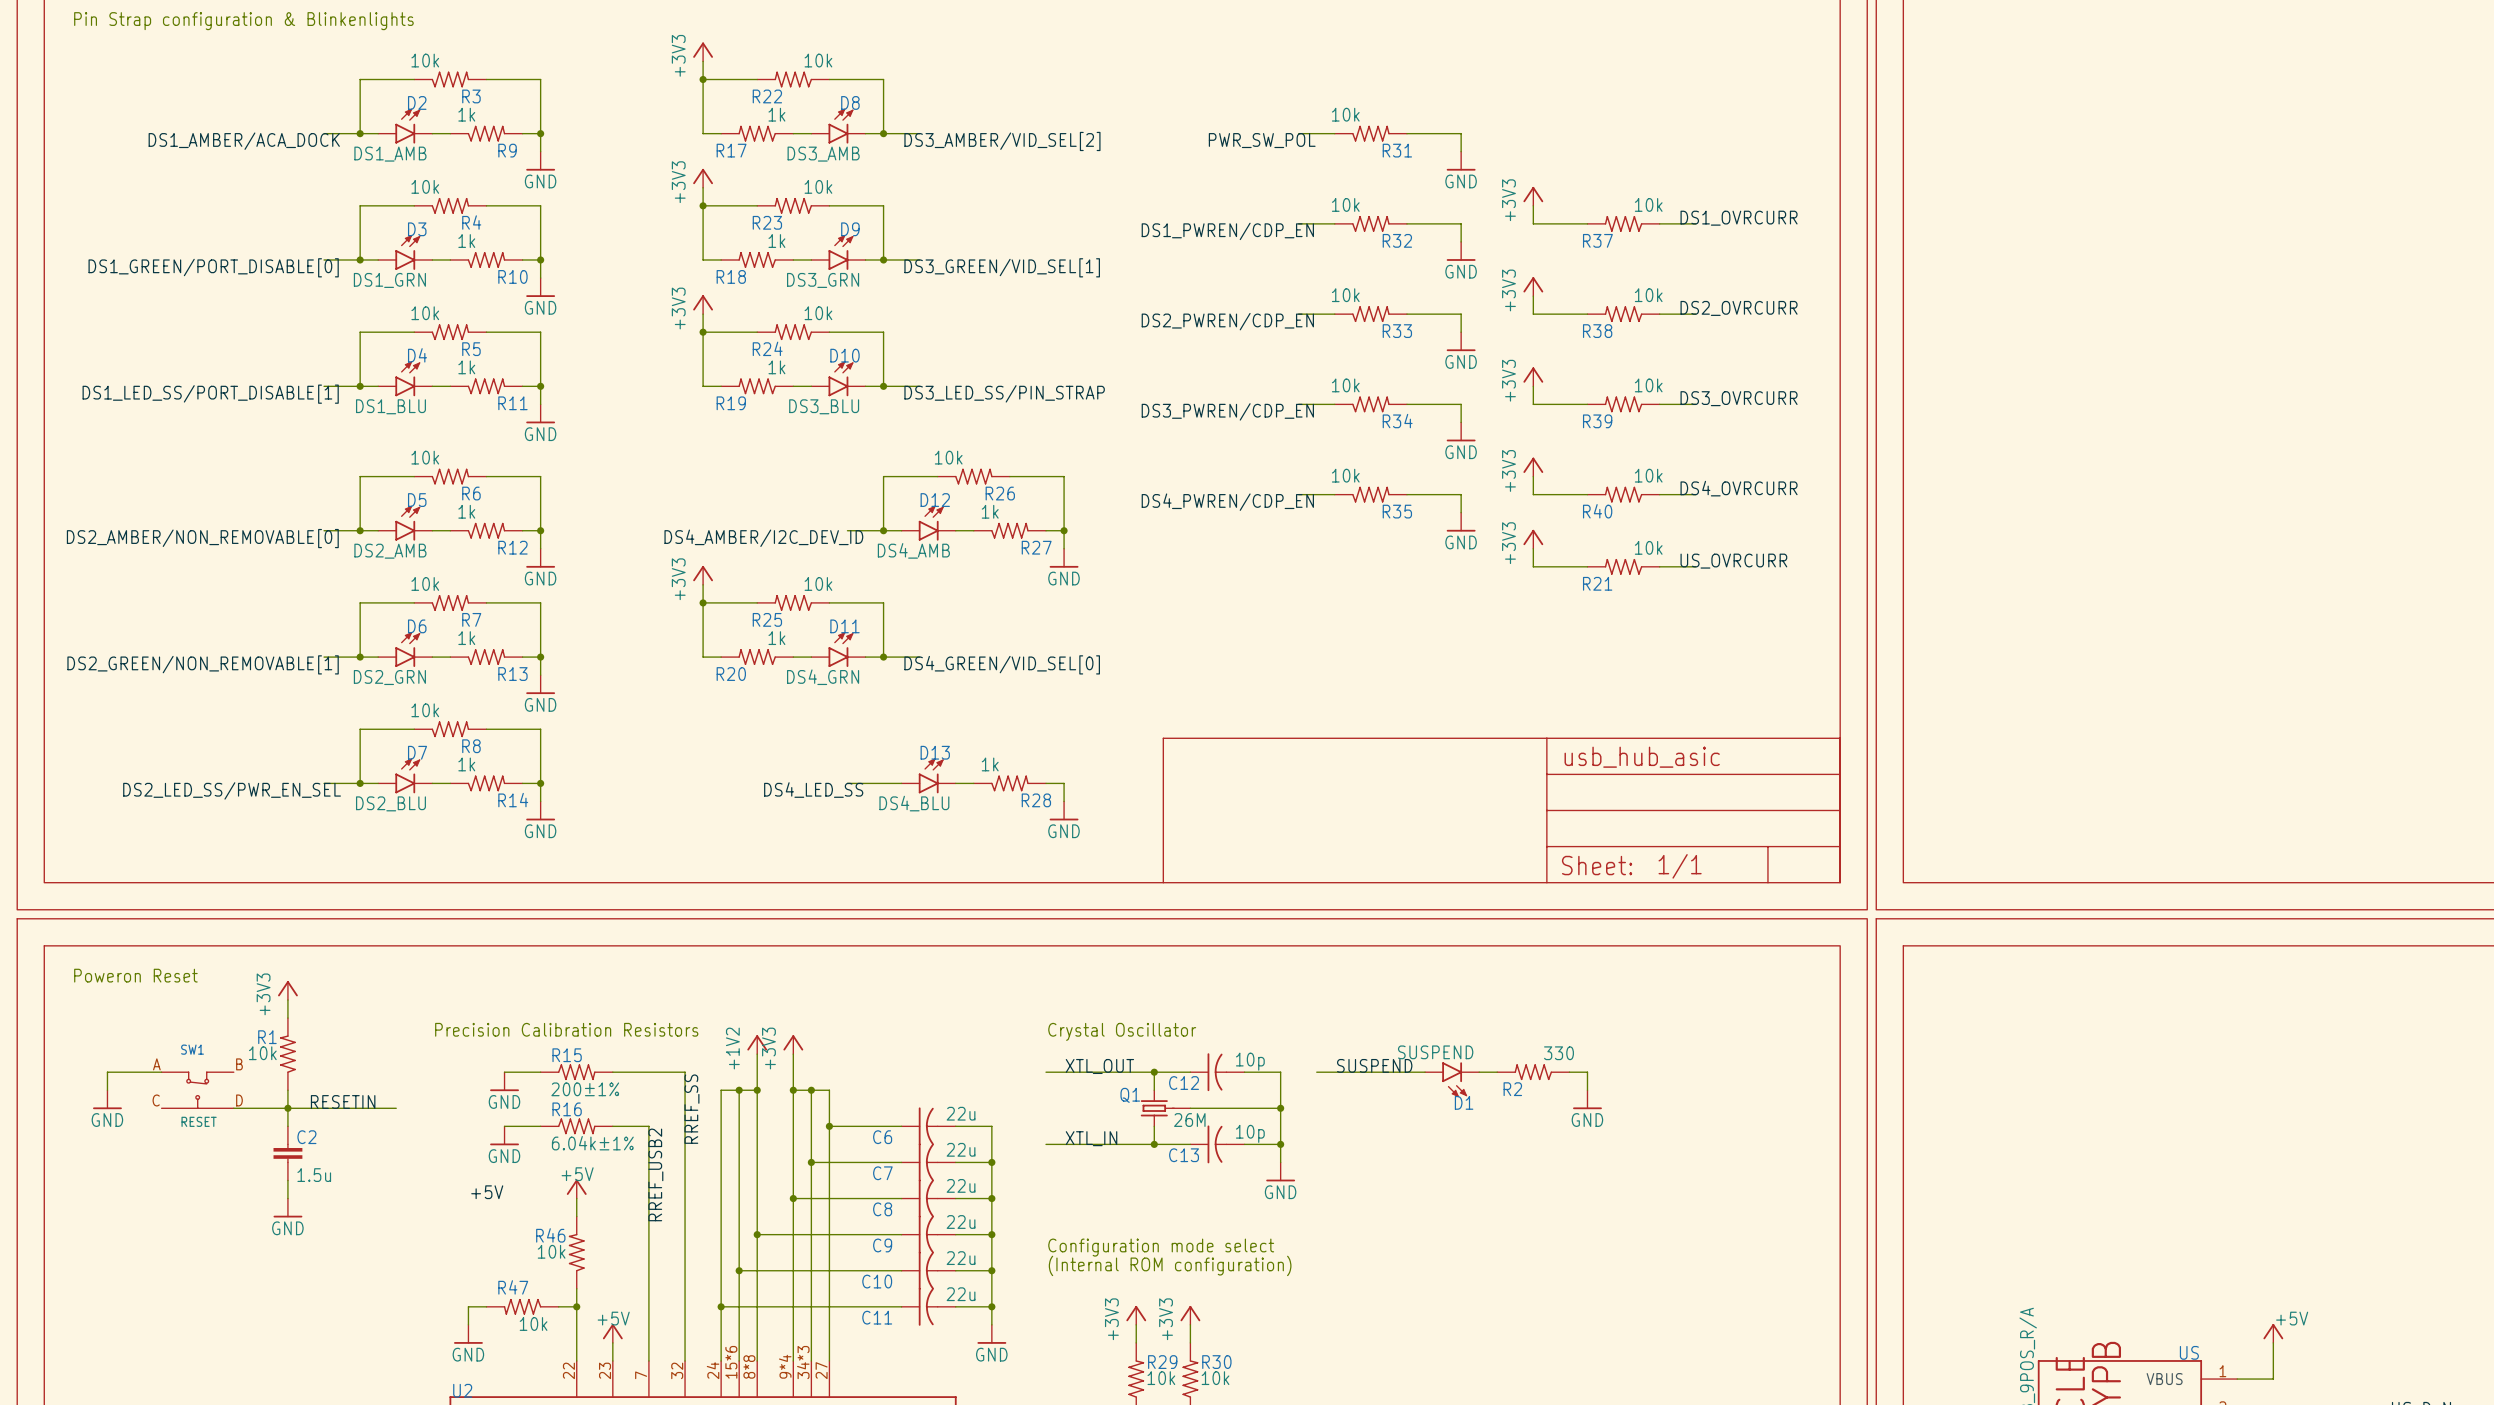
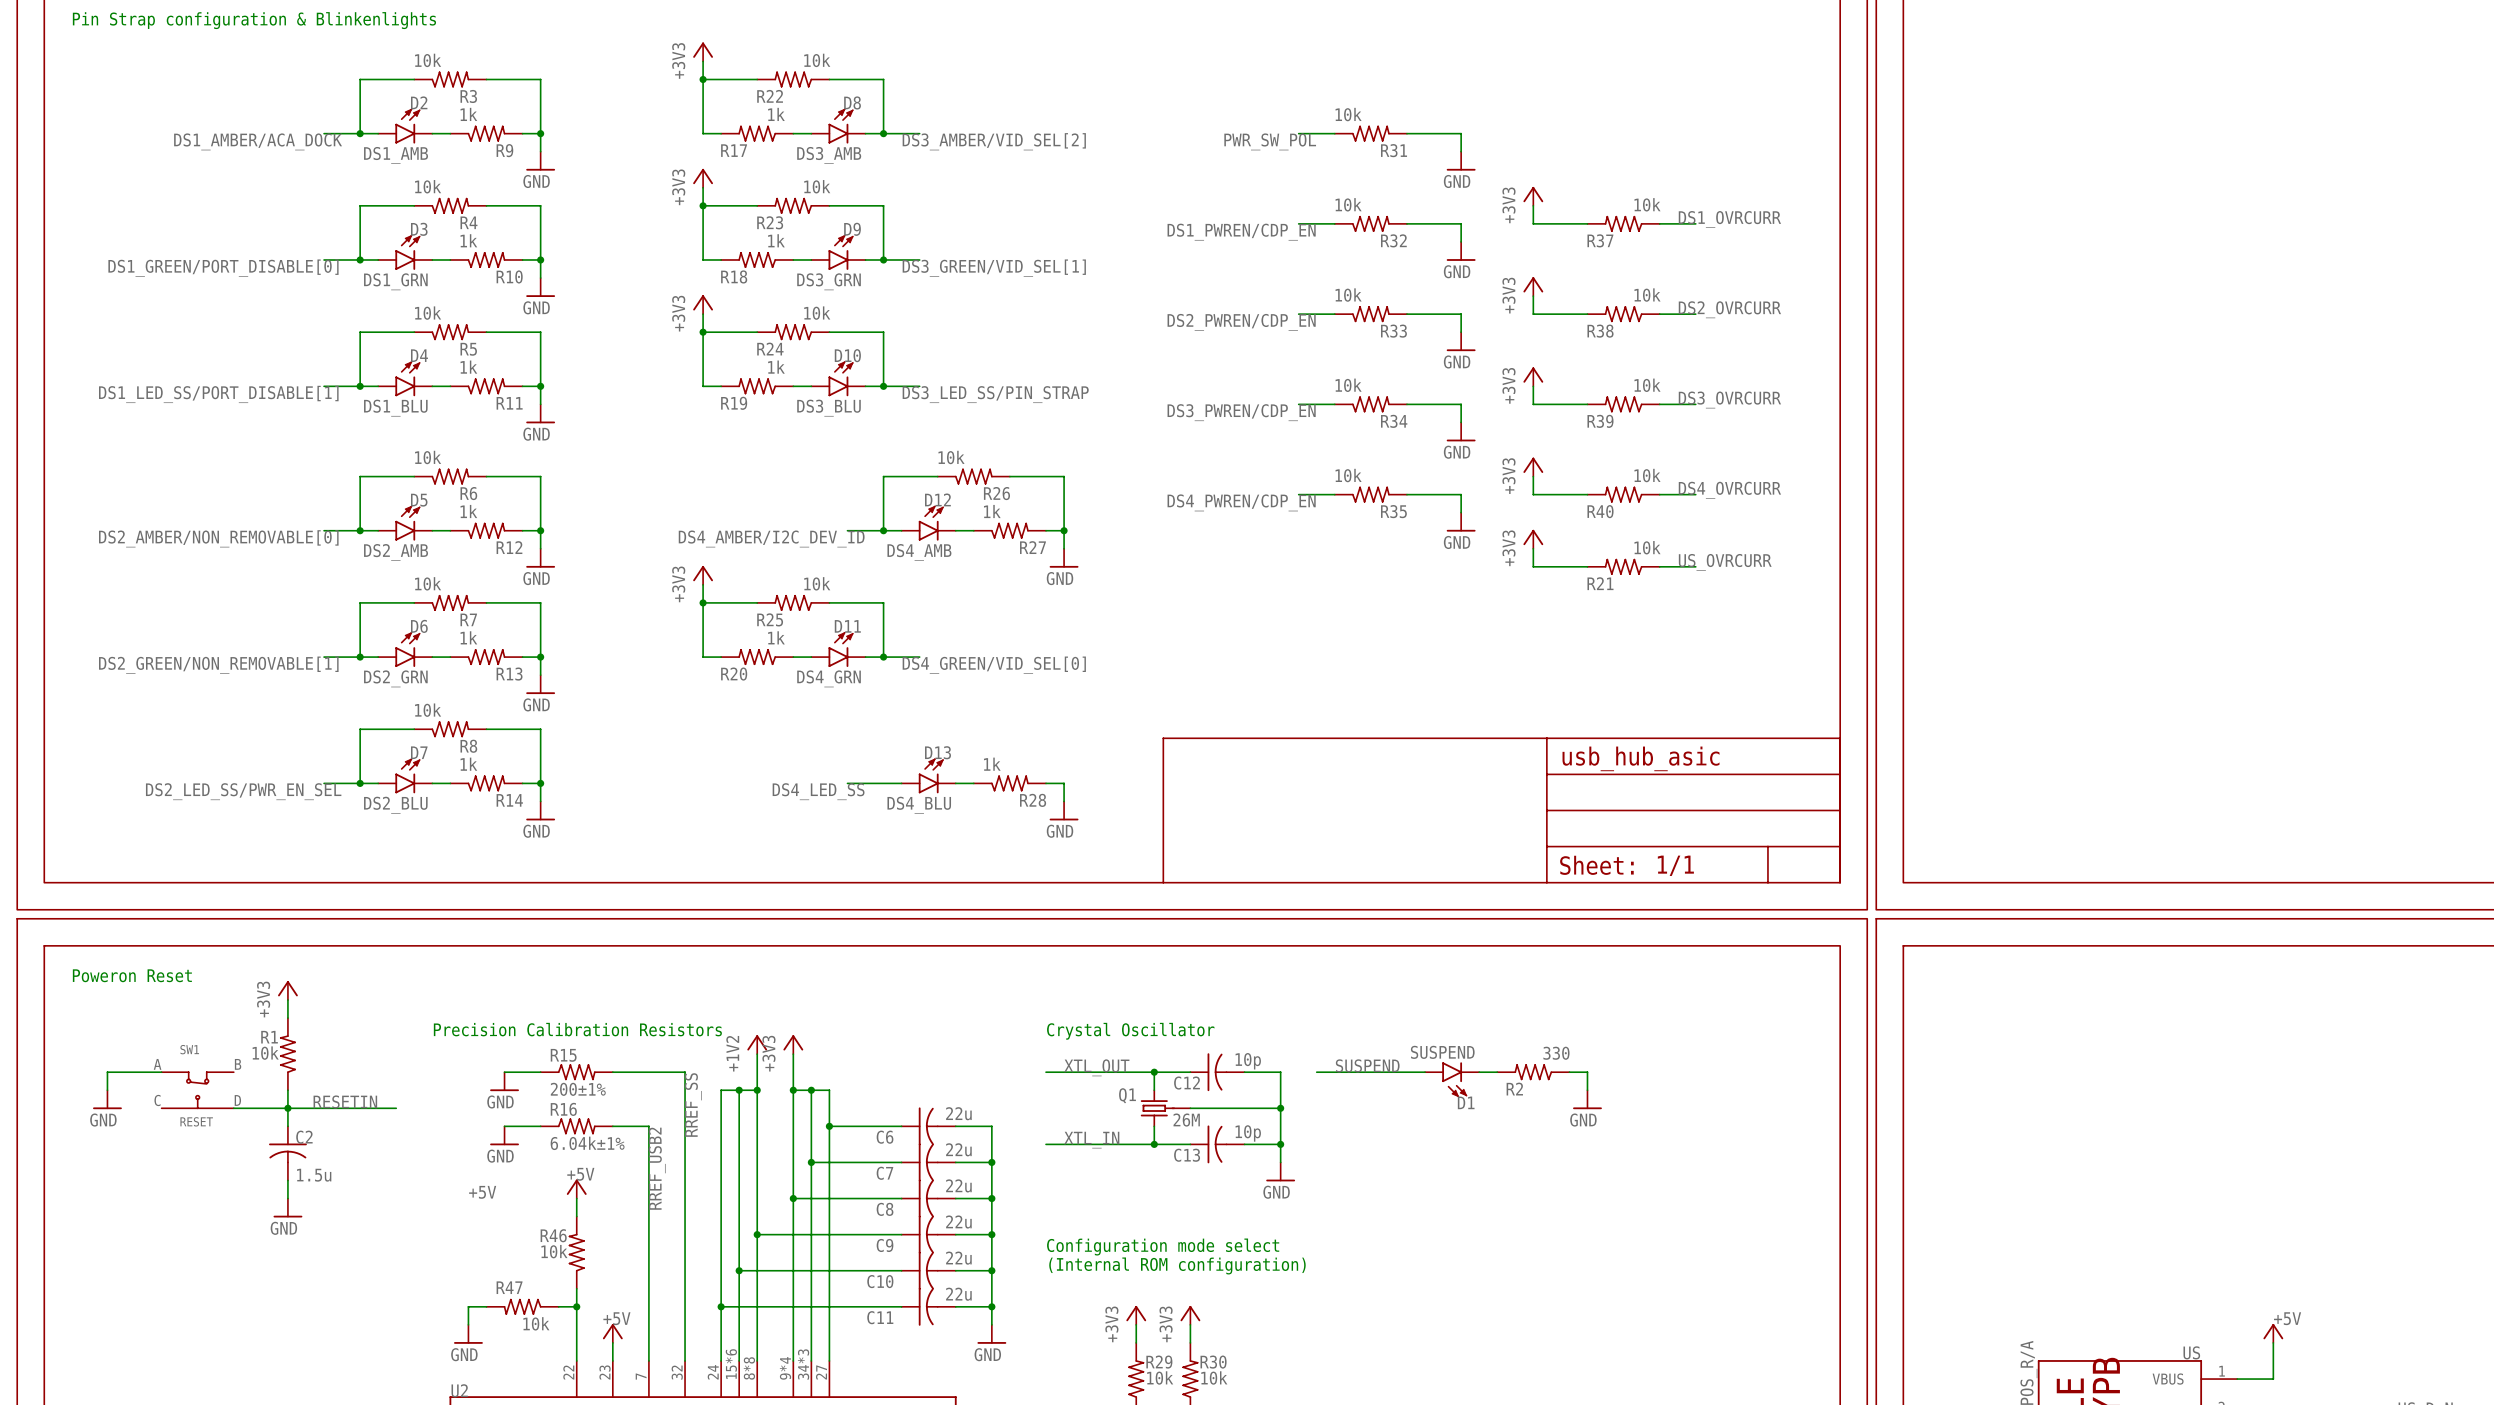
C2 symbol: [273, 1126, 303, 1181] -> [268, 1126, 307, 1181]

